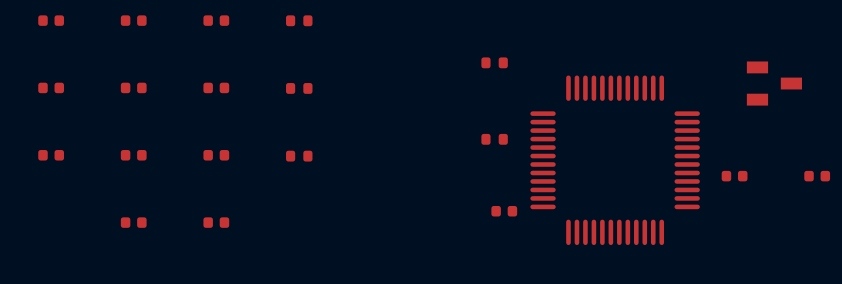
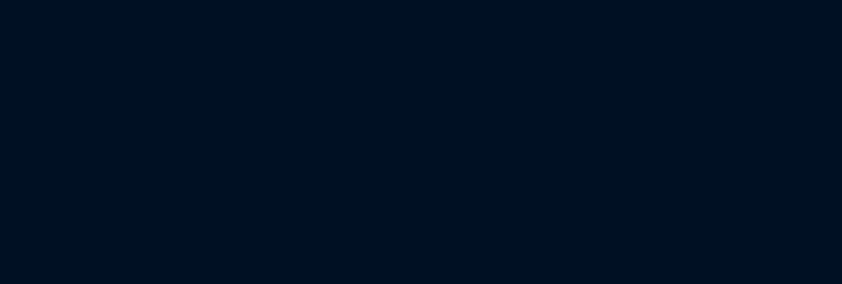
part: (51, 20) -> none
part: (133, 20) -> none
part: (216, 20) -> none
part: (299, 20) -> none
part: (494, 62) -> none
part: (774, 83) -> none
part: (51, 87) -> none
part: (133, 87) -> none
part: (216, 87) -> none
part: (299, 88) -> none
part: (494, 139) -> none
part: (51, 155) -> none
part: (133, 155) -> none
part: (216, 155) -> none
part: (299, 156) -> none
part: (615, 160) -> none
part: (734, 176) -> none
part: (817, 176) -> none
part: (504, 211) -> none
part: (133, 222) -> none
part: (216, 222) -> none

